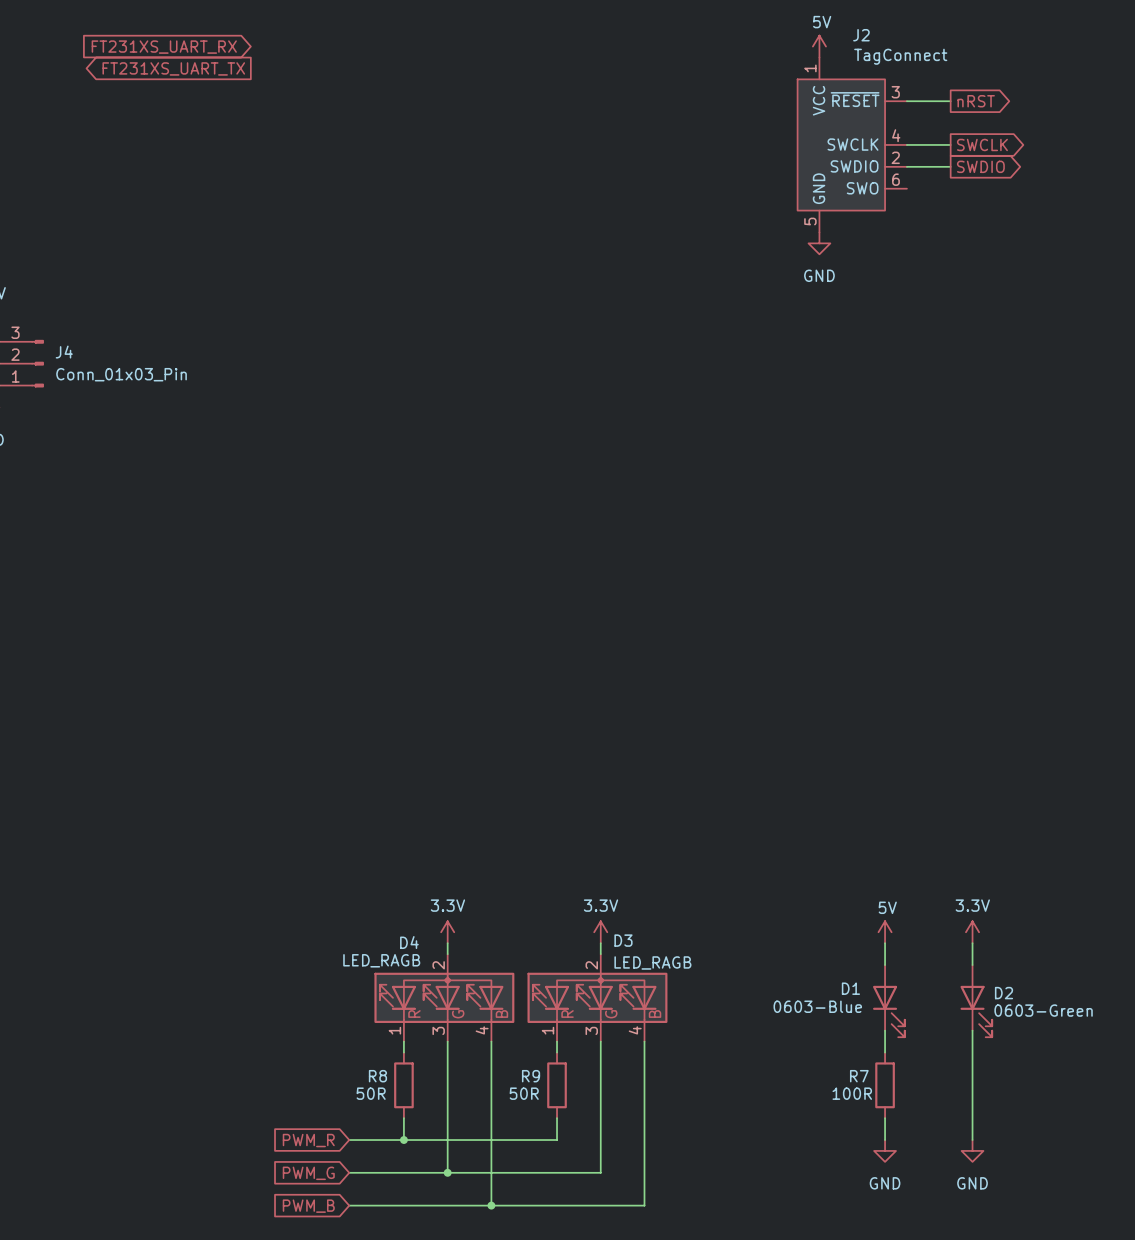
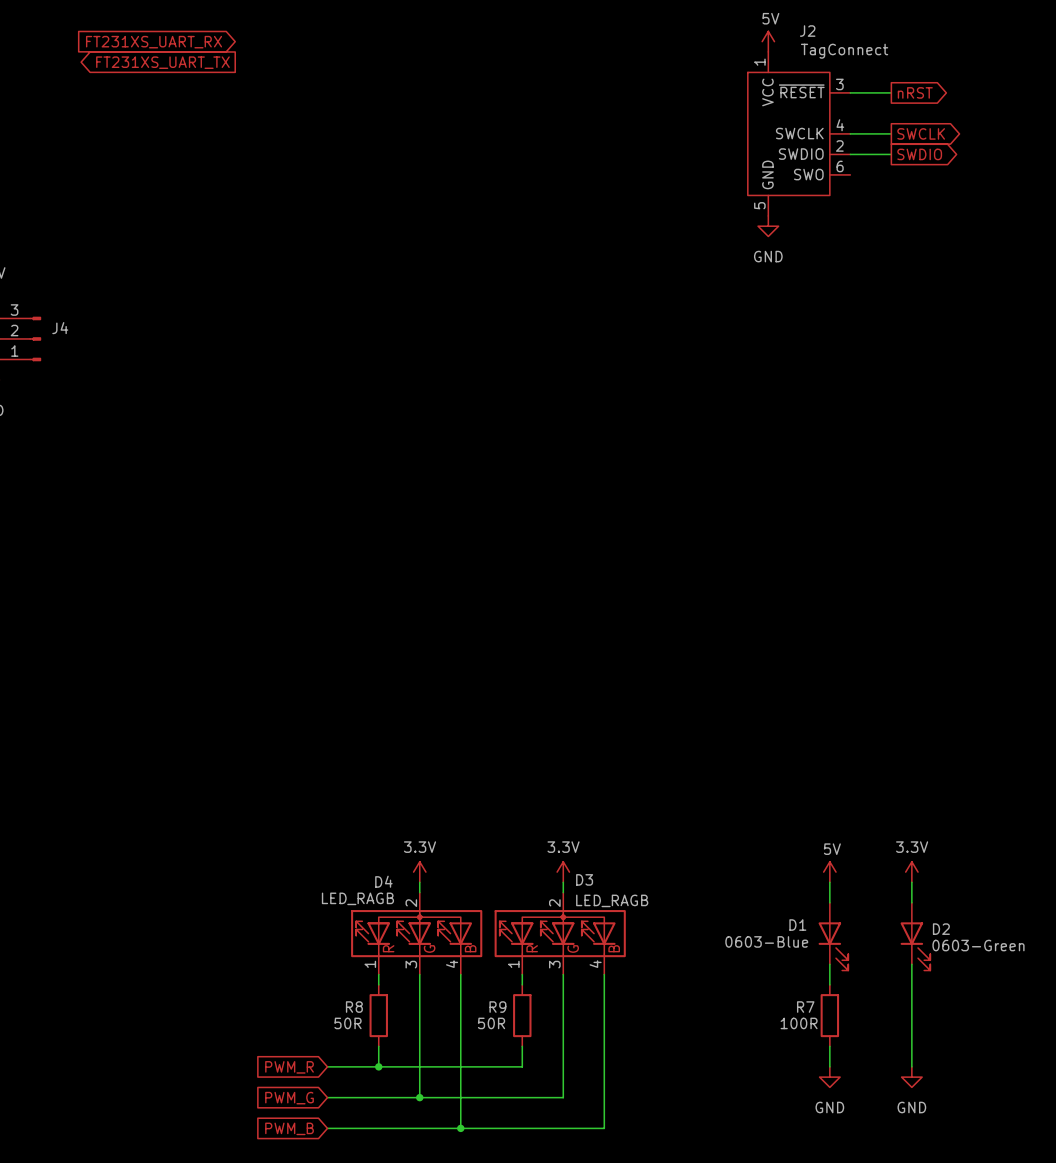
J4 value: Conn_01x03_Pin (121, 374) -> none

